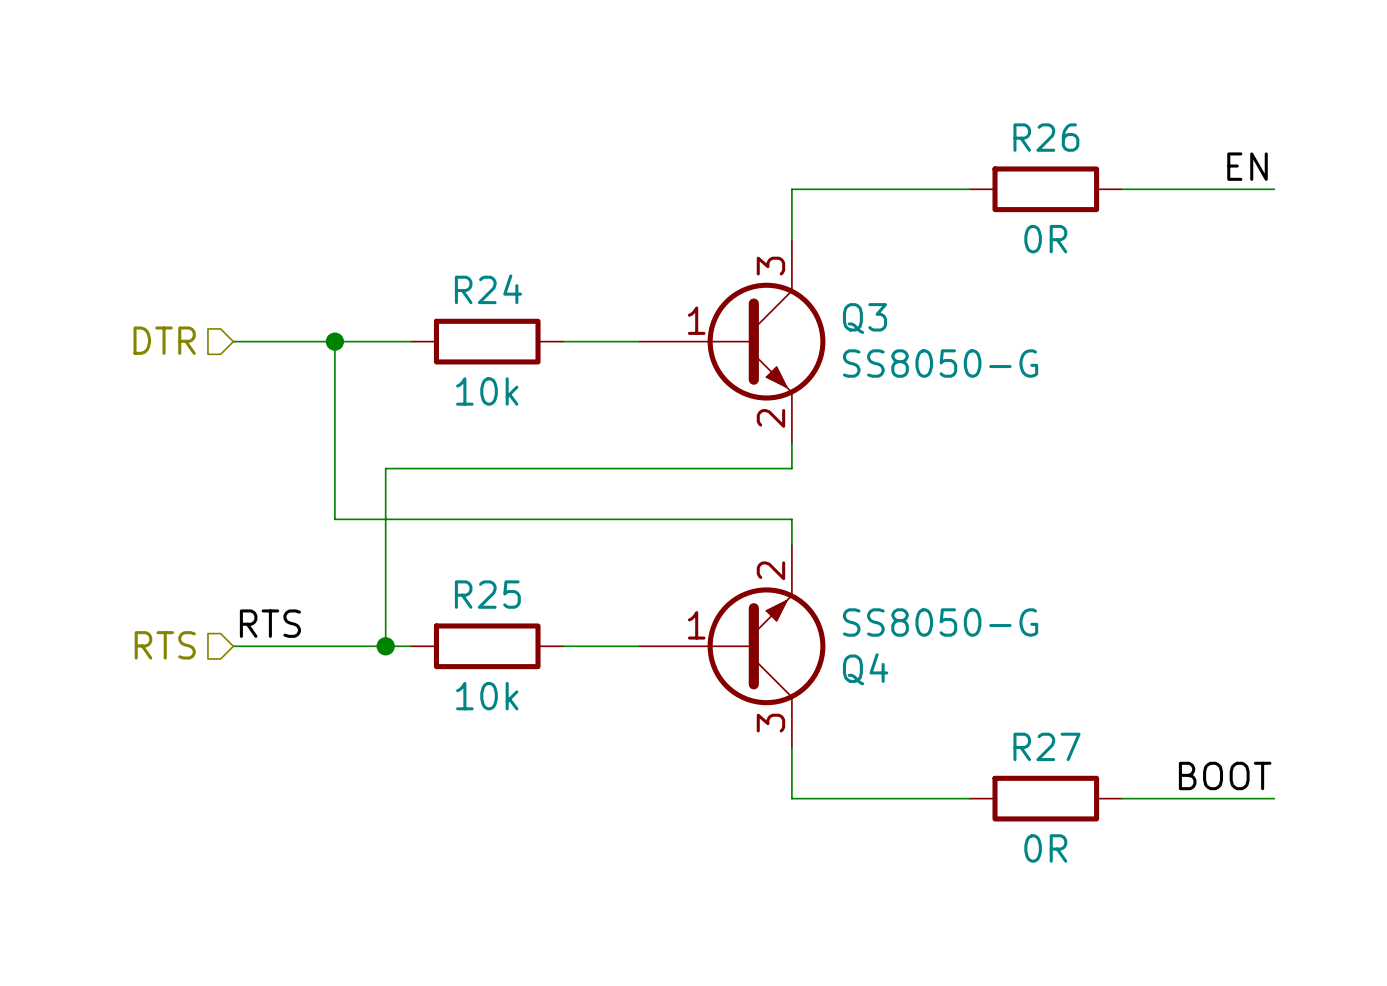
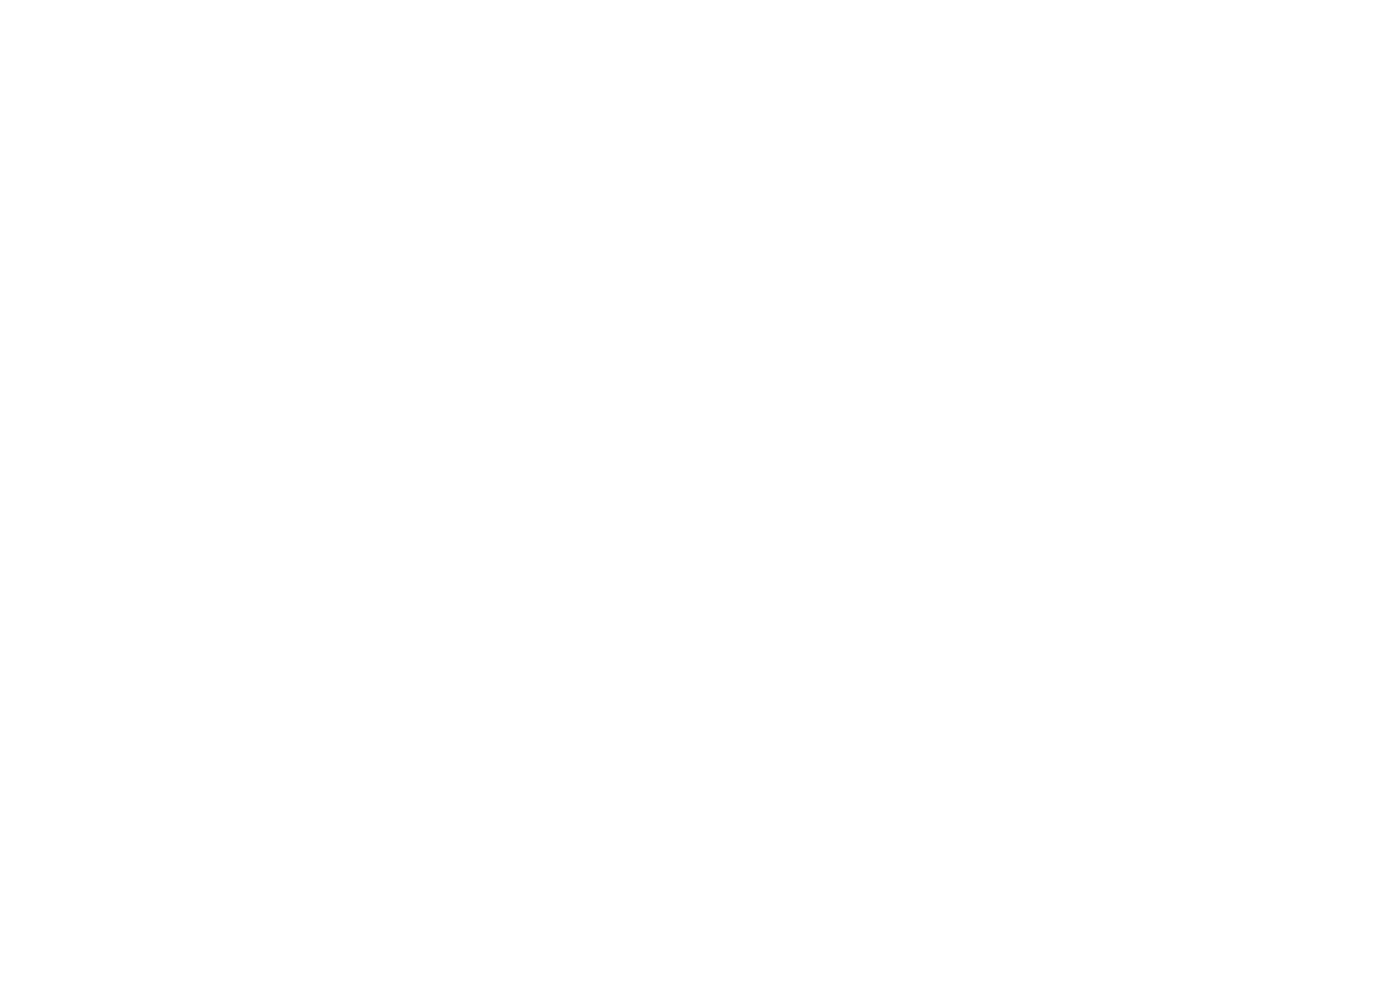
label: EN (1247, 166) -> none
wire: (969, 189) (791, 189) (791, 240) -> none
R26: 0R (1045, 189) -> none
wire: (1121, 189) (1274, 189) -> none
hierarchical label: DTR (164, 340) -> none
wire: (233, 341) (411, 341) -> none
wire: (334, 341) (334, 519) (791, 519) (791, 544) -> none
junction: (334, 341) -> none
R24: 10k (487, 341) -> none
wire: (563, 341) (639, 341) -> none
Q3: SS8050-G (732, 341) -> none
wire: (791, 443) (791, 468) (385, 468) (385, 646) -> none
label: RTS (270, 623) -> none
hierarchical label: RTS (165, 645) -> none
wire: (233, 646) (411, 646) -> none
junction: (385, 646) -> none
R25: 10k (487, 646) -> none
wire: (563, 646) (639, 646) -> none
Q4: SS8050-G (732, 646) -> none
wire: (791, 747) (791, 798) (969, 798) -> none
label: BOOT (1225, 775) -> none
R27: 0R (1045, 798) -> none
wire: (1121, 798) (1274, 798) -> none

